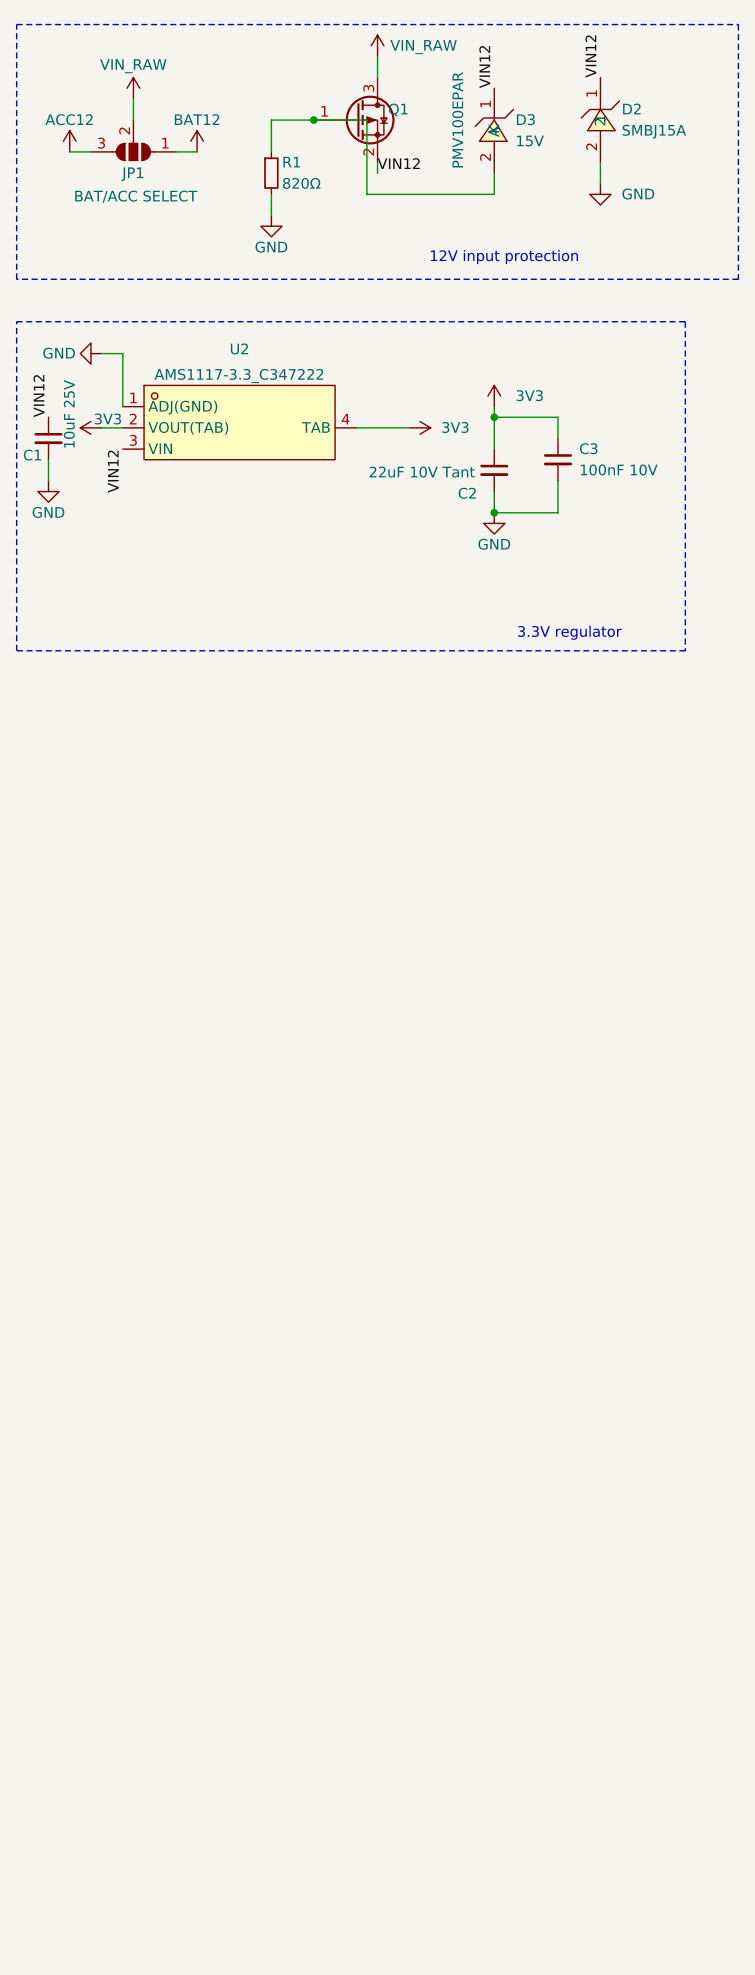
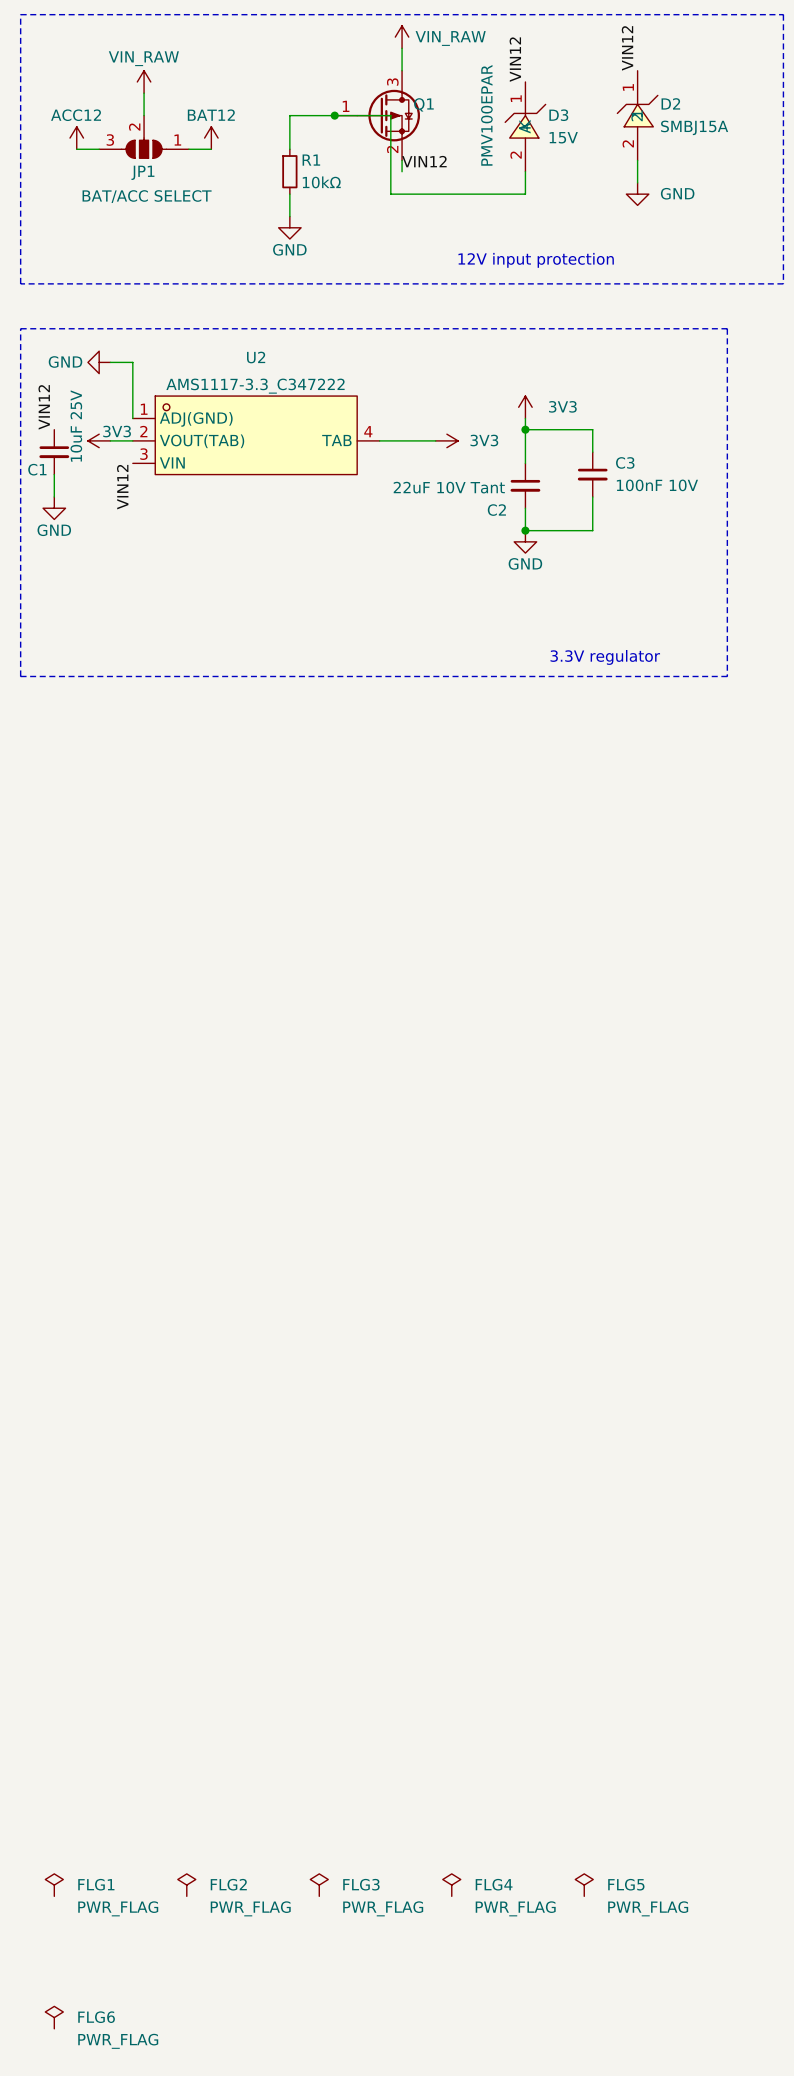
R1 value: 820Ω (301, 183) -> 10kΩ (321, 182)
FLG1: none -> PWR_FLAG (54, 1885)
FLG2: none -> PWR_FLAG (186, 1885)
FLG3: none -> PWR_FLAG (319, 1885)
FLG4: none -> PWR_FLAG (451, 1885)
FLG5: none -> PWR_FLAG (584, 1885)
FLG6: none -> PWR_FLAG (54, 2017)

